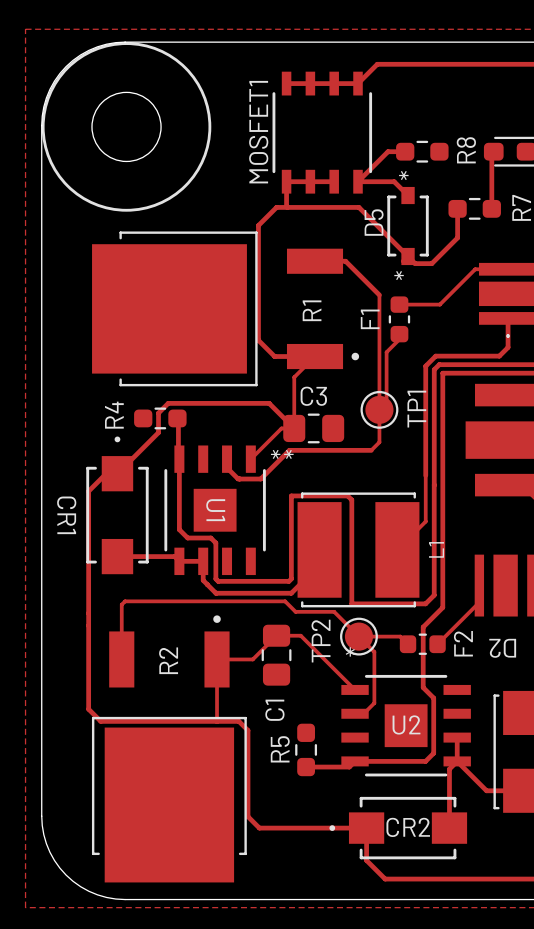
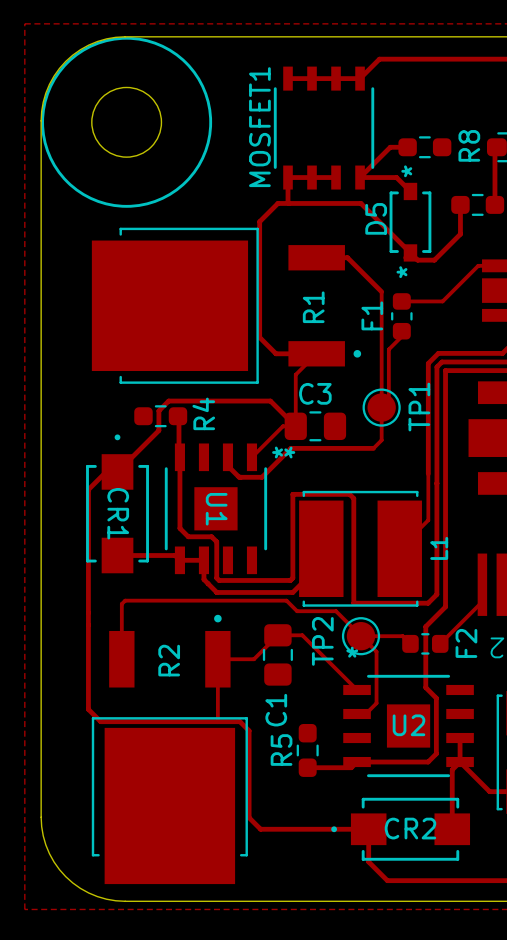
R4 name position: R4 (114, 415) -> R4 (203, 413)
CR1 name position: CR1 (66, 515) -> CR1 (118, 513)

